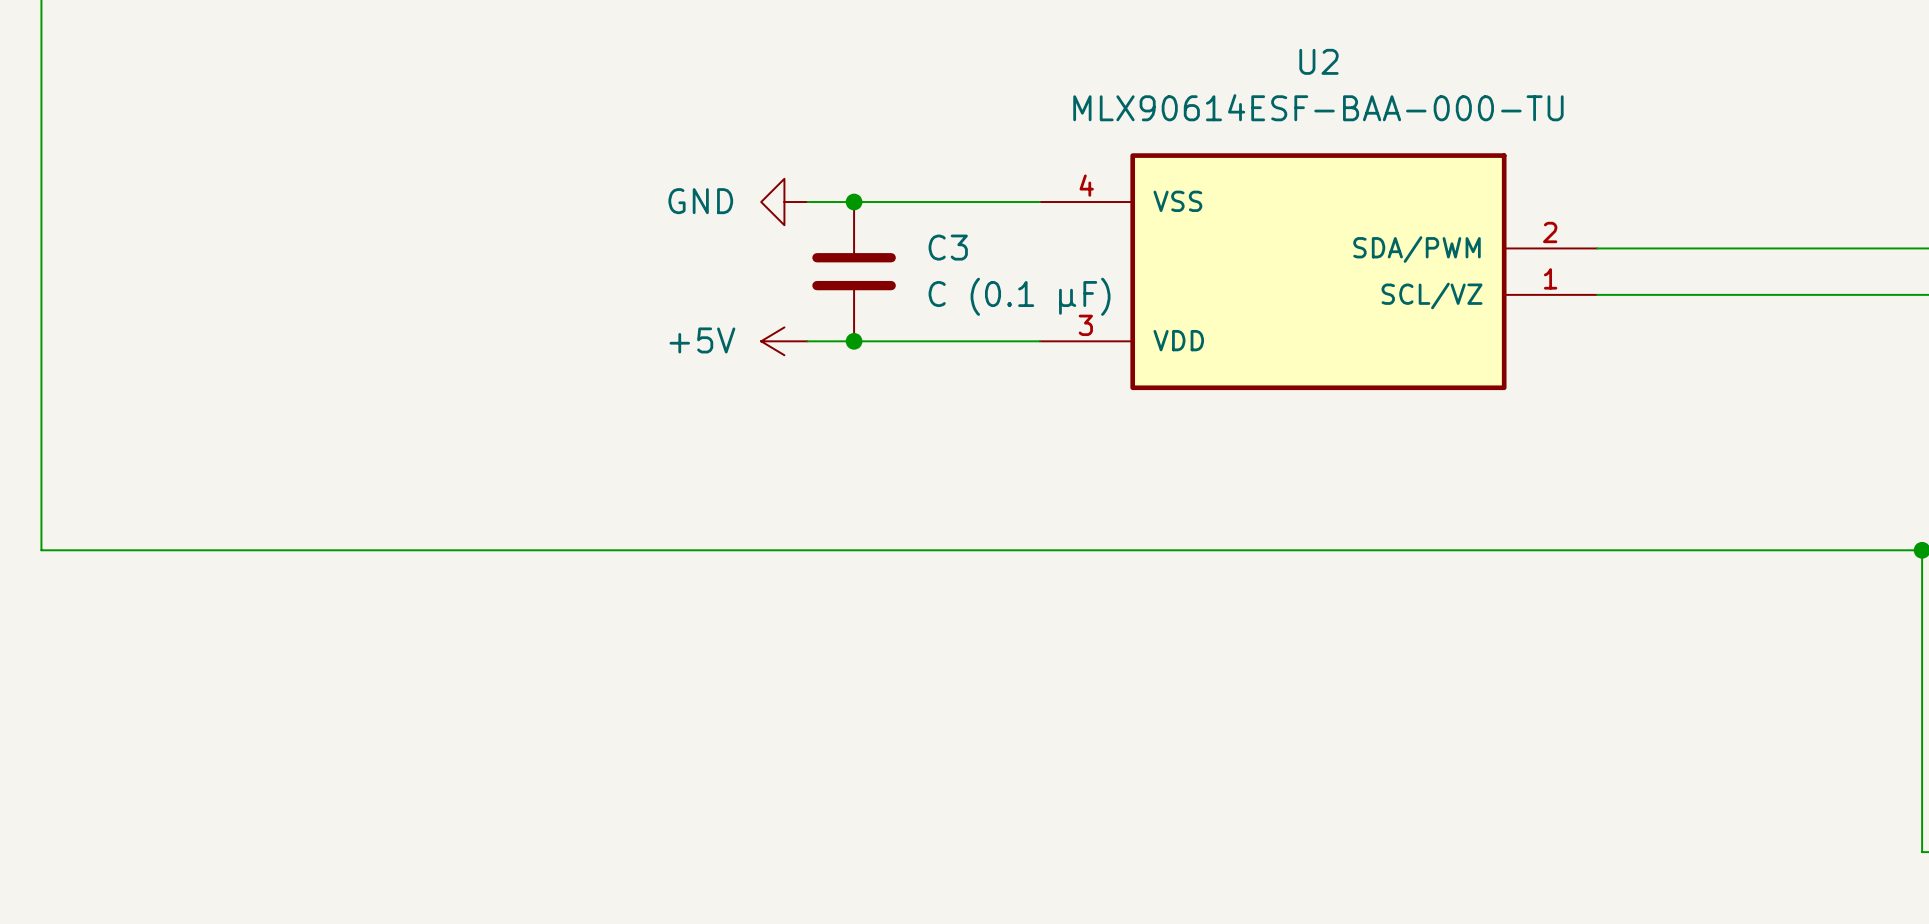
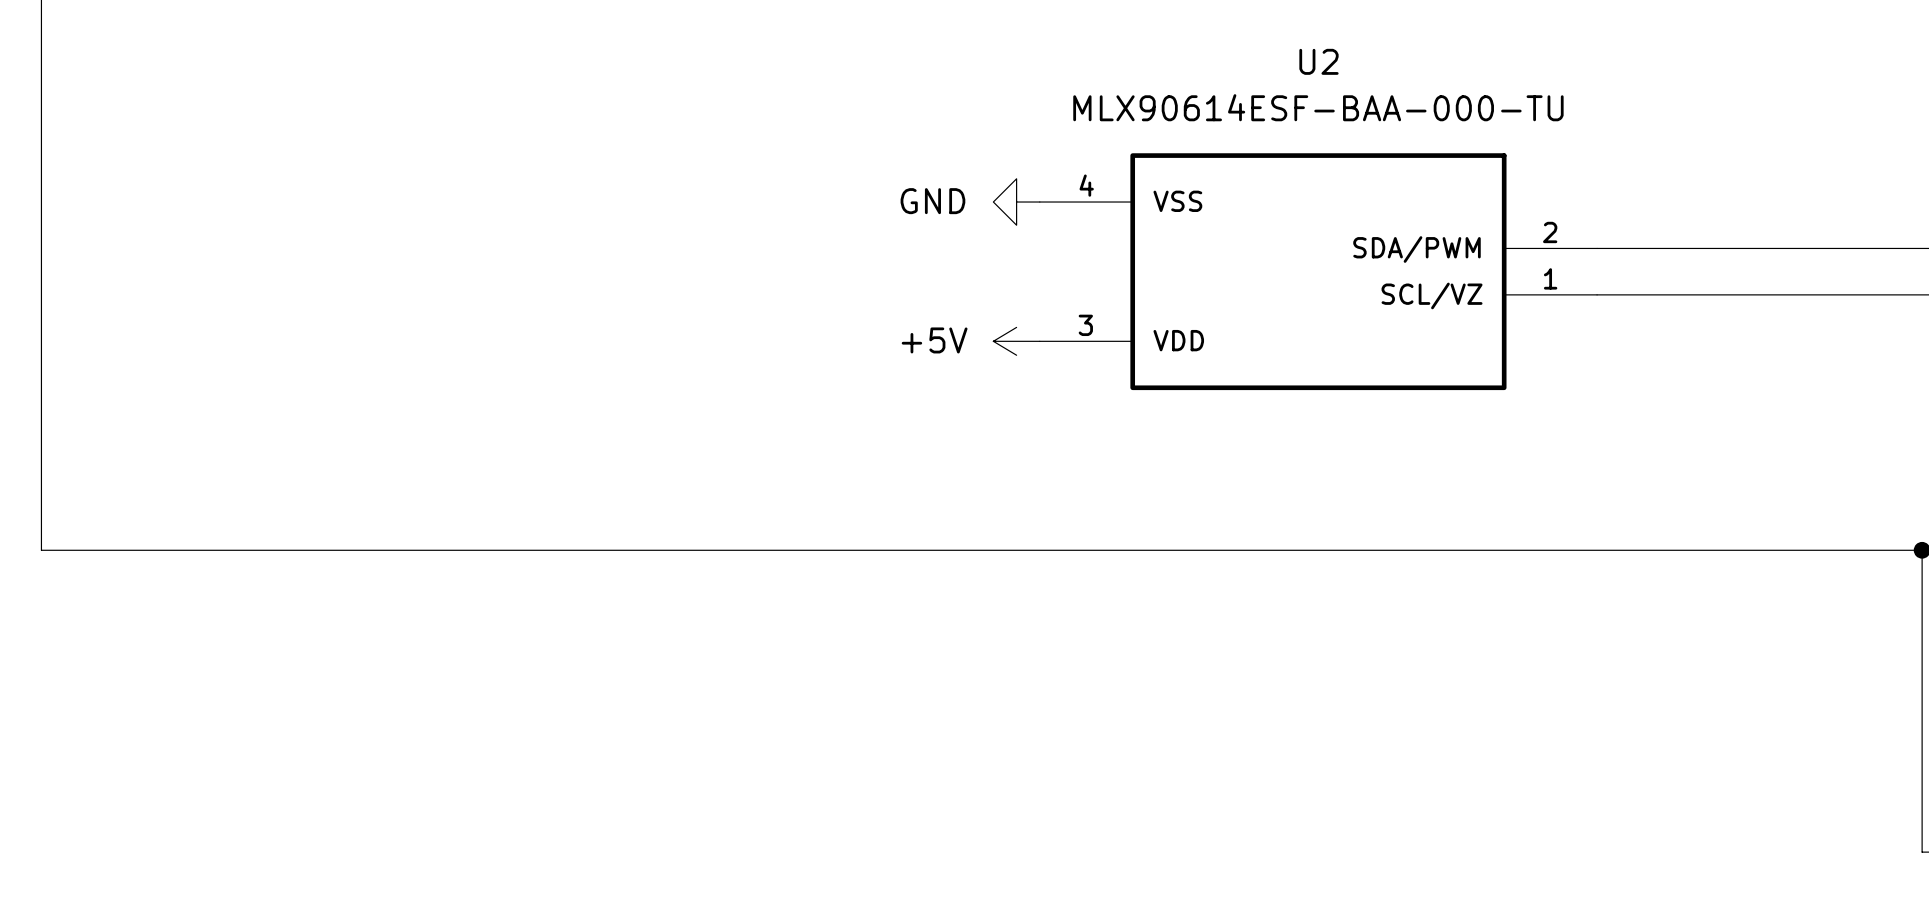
power symbol position: GND (784, 202) -> GND (1016, 202)
wire: (807, 202) (1039, 202) -> none
junction: (854, 202) -> none
C3: C (0.1 μF) (854, 271) -> none
power symbol position: +5V (784, 341) -> +5V (1016, 341)
wire: (807, 341) (1039, 341) -> none
junction: (854, 341) -> none

